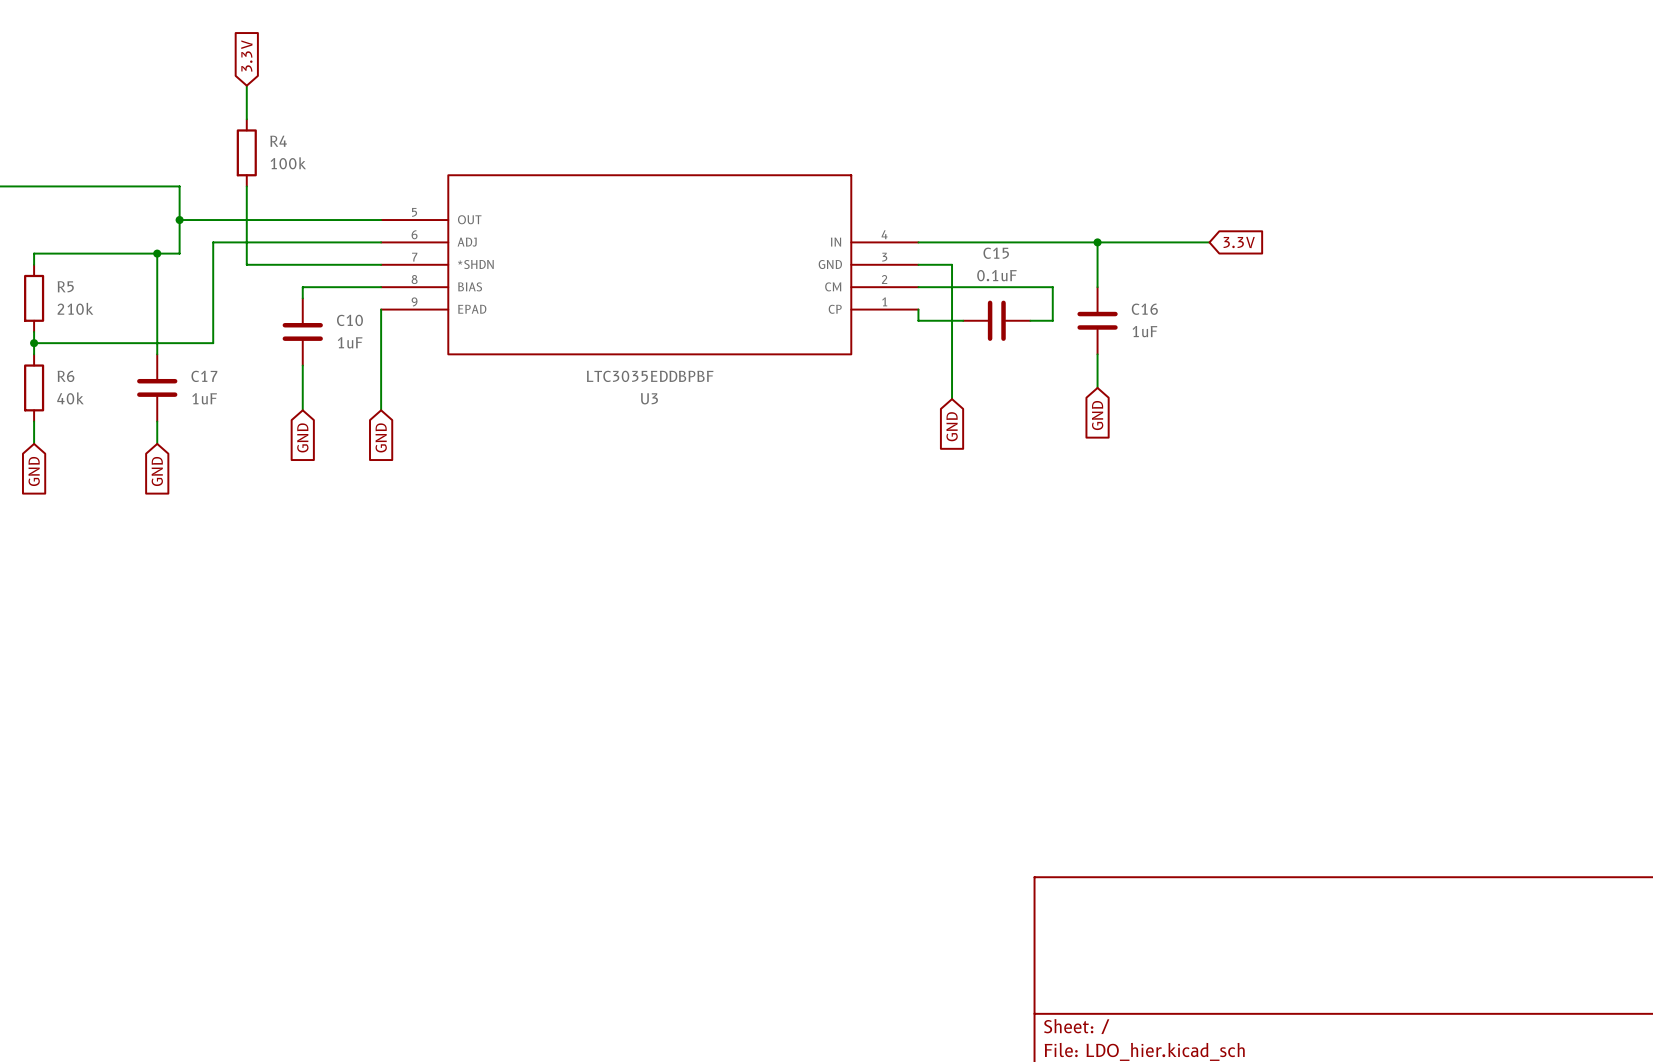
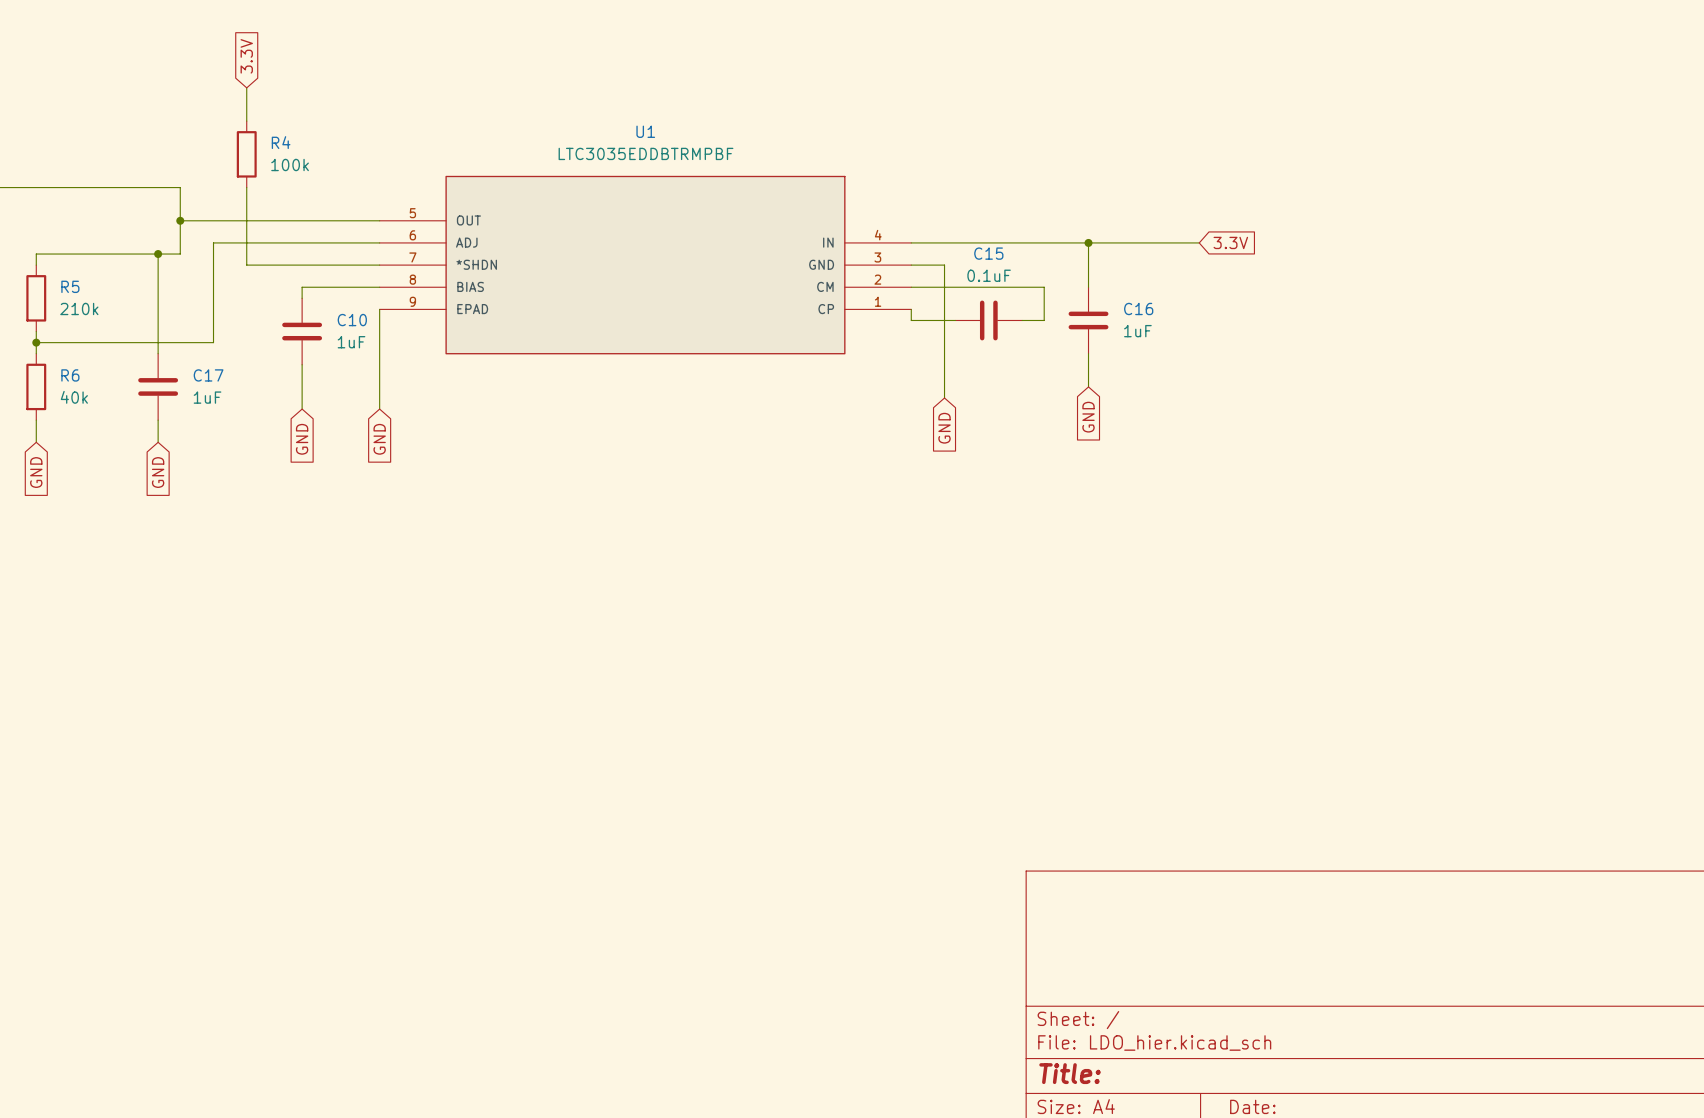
U3 value: LTC3035EDDBPBF (650, 376) -> LTC3035EDDBTRMPBF (646, 153)
U3 name: U3 (649, 398) -> U1 (645, 131)

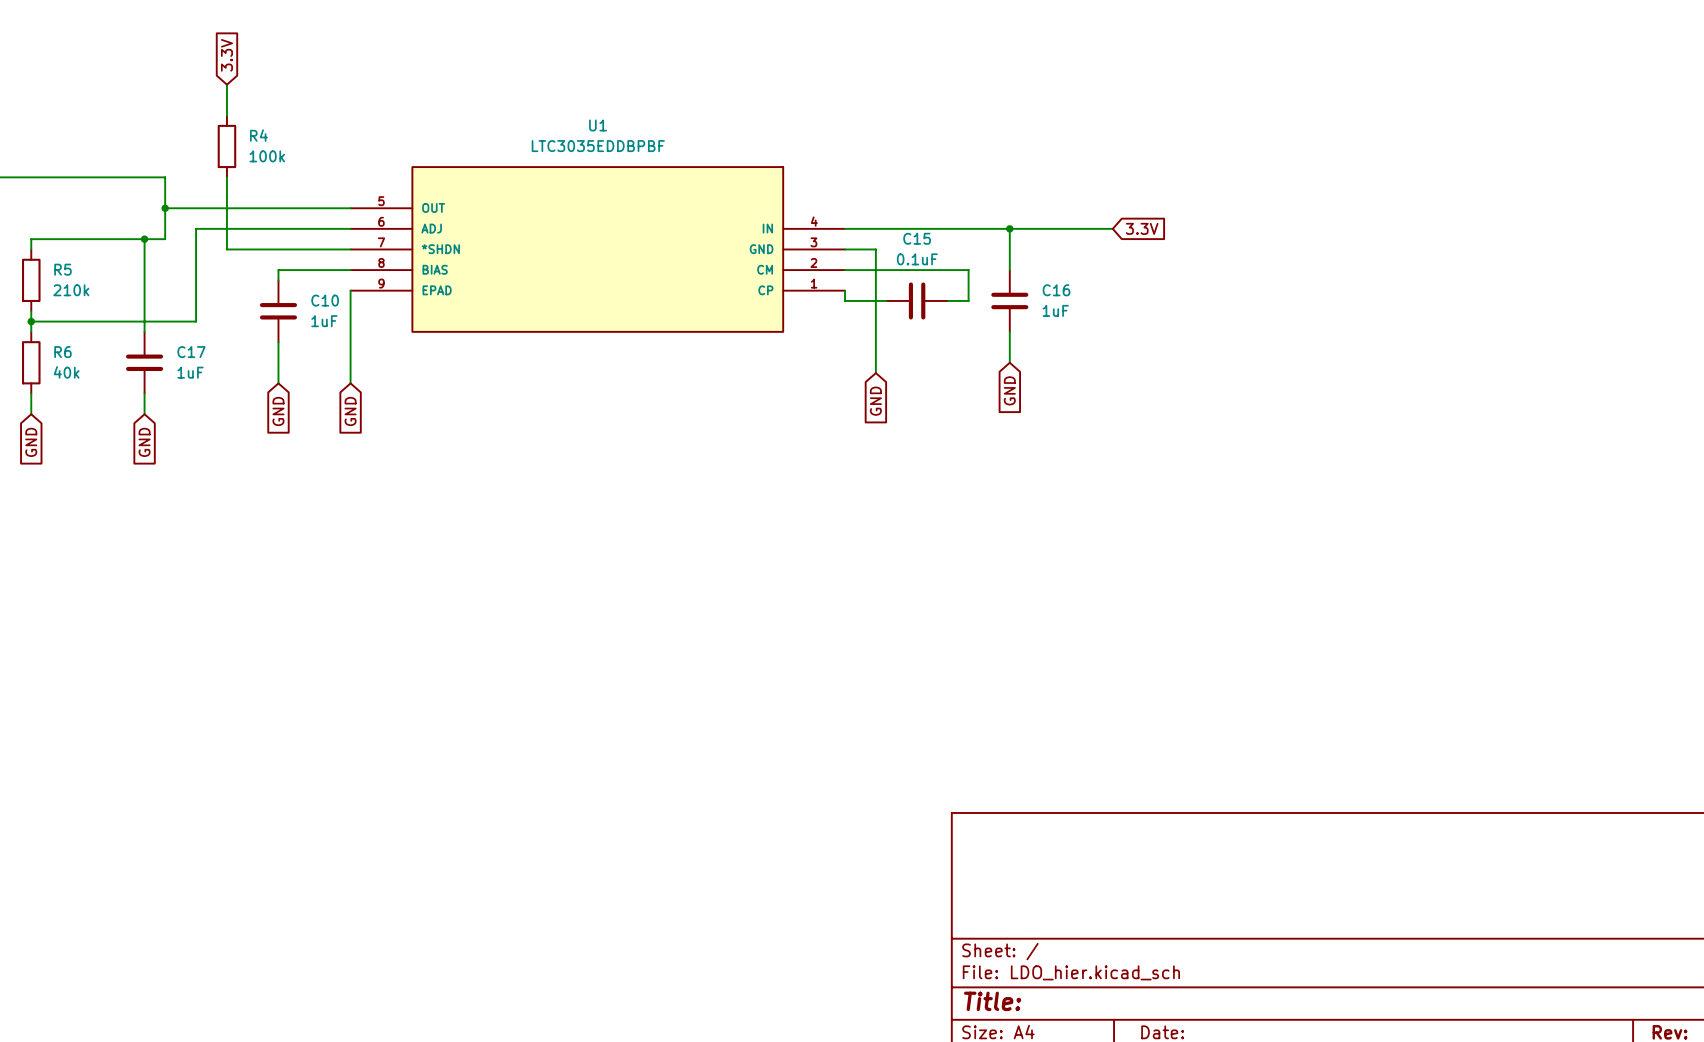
U1 value: LTC3035EDDBTRMPBF (646, 153) -> LTC3035EDDBPBF (598, 146)

